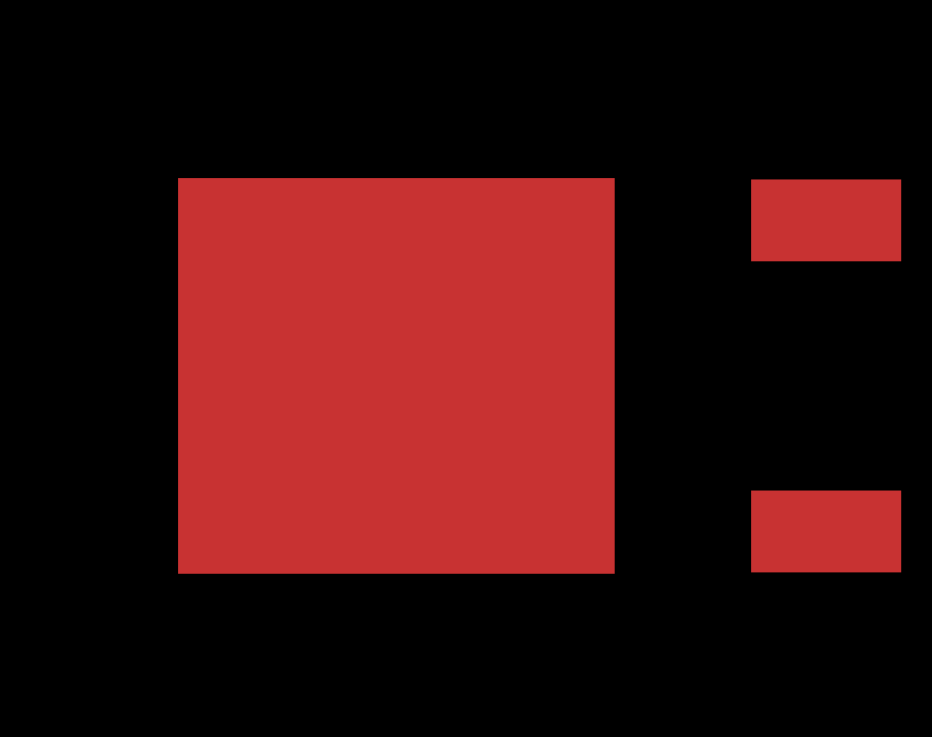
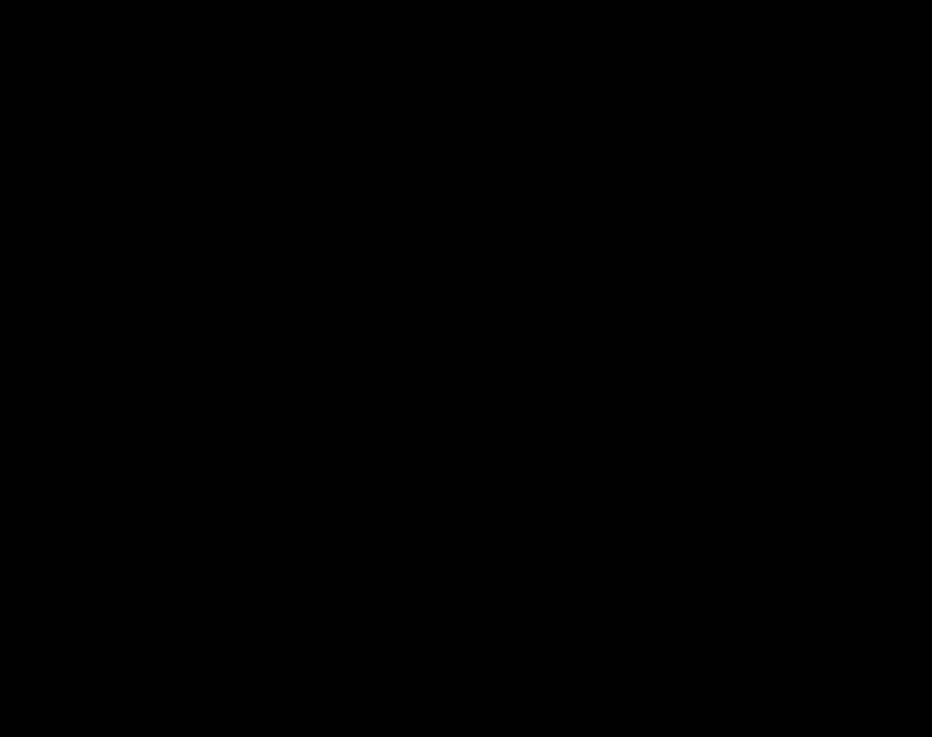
part: (539, 375) -> none

